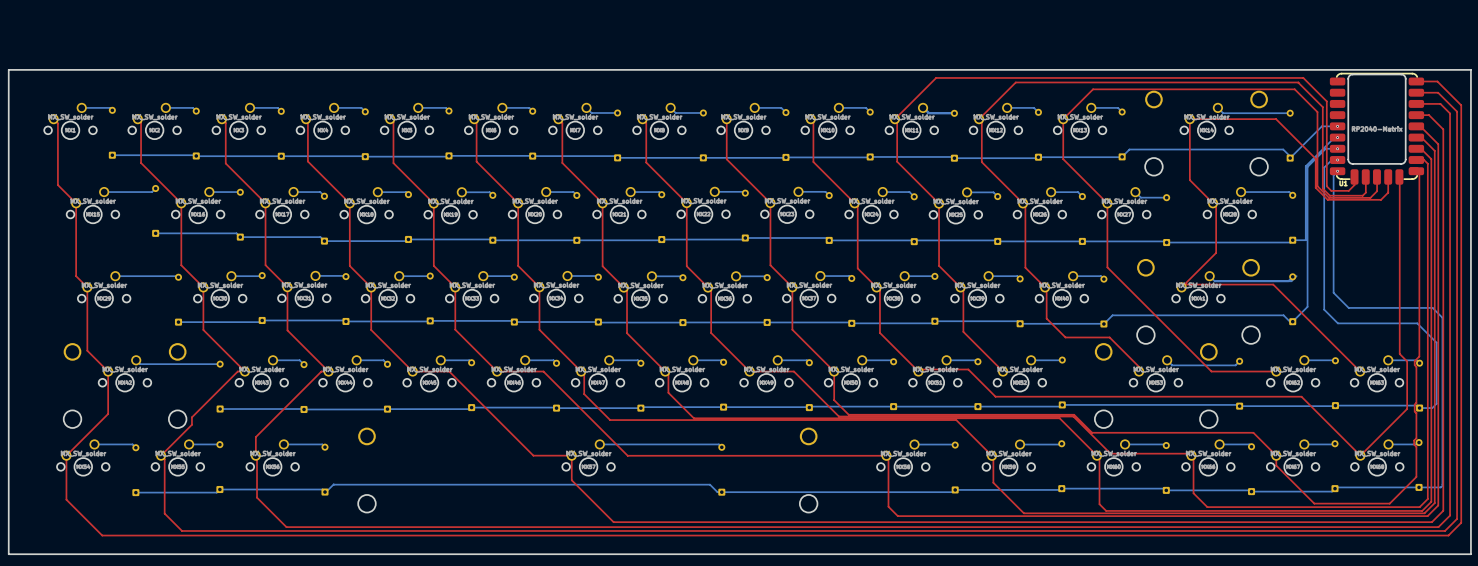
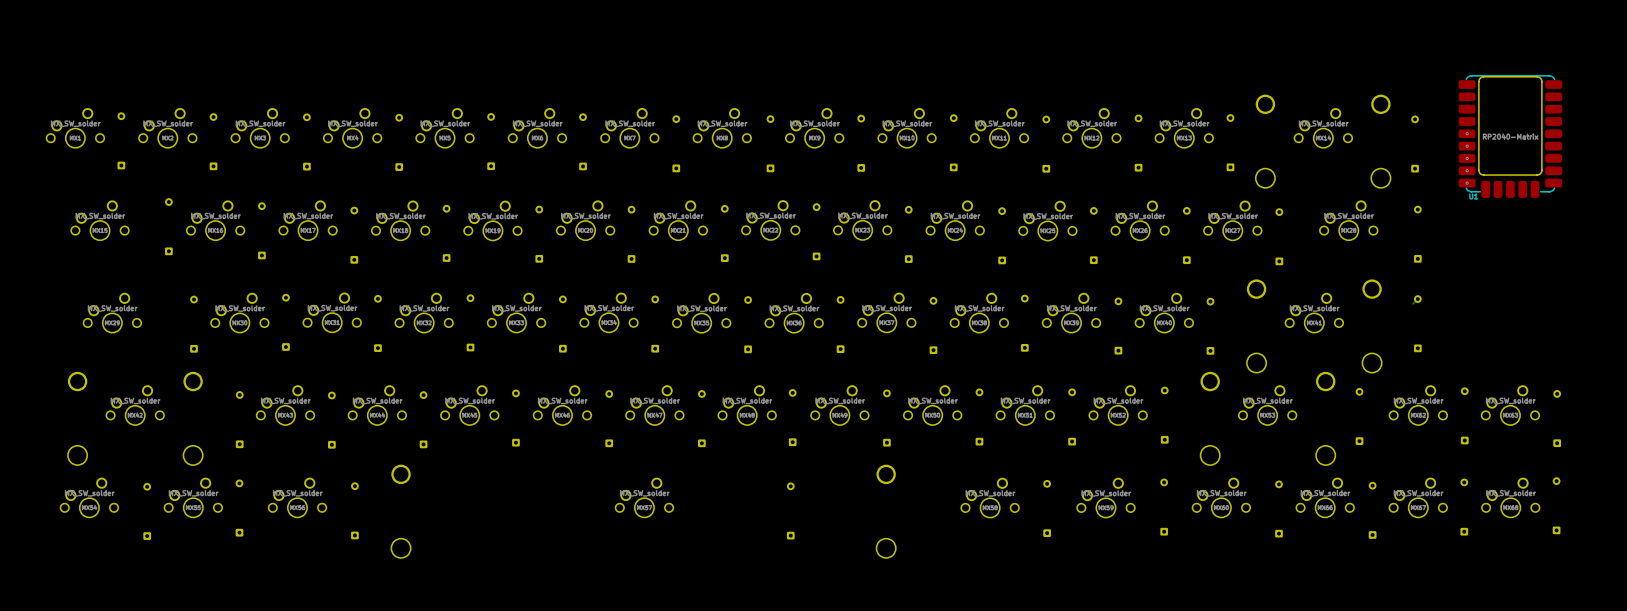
board edge: (8, 69) (1470, 69) (1470, 554) (8, 554) (8, 69) -> none
top track: (1416, 81) (1437, 81) (1461, 105) (1461, 522) (1448, 535) (102, 535) (66, 499) (66, 455) (108, 413) (108, 371) (87, 350) (87, 287) (76, 276) (76, 203) (57, 185) (57, 123) (53, 119) -> none
top track: (1416, 92) (1438, 92) (1457, 111) (1457, 518) (1444, 530) (182, 530) (164, 513) (164, 459) (161, 455) (191, 424) (191, 417) (237, 371) (244, 371) (203, 329) (203, 287) (181, 265) (181, 203) (141, 162) (141, 122) (137, 119) -> none
top track: (1416, 103) (1440, 103) (1450, 113) (1450, 515) (1438, 527) (286, 527) (257, 497) (255, 437) (321, 371) (328, 371) (287, 330) (287, 287) (265, 265) (265, 203) (225, 163) (225, 122) (221, 119) -> none
bottom track: (81, 107) (109, 107) (112, 110) -> none
bottom track: (165, 107) (193, 107) (196, 111) -> none
bottom track: (249, 107) (277, 107) (281, 111) -> none
bottom track: (334, 107) (361, 107) (365, 111) -> none
bottom track: (418, 107) (445, 107) (448, 111) -> none
bottom track: (502, 107) (529, 107) (532, 111) -> none
bottom track: (586, 107) (591, 112) (617, 112) -> none
bottom track: (670, 107) (675, 112) (703, 112) -> none
bottom track: (754, 107) (781, 107) (785, 112) -> none
bottom track: (838, 107) (865, 107) (870, 112) -> none
bottom track: (1007, 107) (1034, 107) (1038, 112) -> none
bottom track: (1091, 107) (1118, 107) (1122, 112) -> none
bottom track: (1217, 107) (1223, 113) (1290, 113) -> none
bottom track: (929, 113) (924, 107) (923, 107) (928, 113) (954, 113) -> none
top track: (1416, 115) (1429, 115) (1443, 129) (1443, 510) (1431, 522) (613, 522) (571, 480) (571, 455) (533, 455) (449, 371) (412, 371) (371, 330) (371, 287) (349, 265) (349, 203) (307, 161) (307, 120) (306, 119) -> none
top track: (390, 119) (393, 122) (393, 163) (433, 203) (433, 265) (455, 287) (455, 329) (497, 371) (543, 371) (627, 455) (886, 455) (888, 457) (888, 506) (897, 516) (1427, 516) (1438, 505) (1438, 144) (1420, 126) (1416, 126) -> none
top track: (474, 119) (476, 121) (476, 161) (518, 203) (518, 265) (539, 287) (539, 329) (584, 374) (584, 394) (610, 420) (956, 420) (993, 457) (993, 482) (1023, 513) (1424, 513) (1434, 503) (1434, 150) (1421, 137) (1416, 137) -> none
top track: (558, 119) (562, 123) (562, 163) (602, 203) (602, 266) (627, 290) (627, 333) (668, 374) (668, 392) (693, 418) (1059, 418) (1099, 458) (1099, 504) (1106, 510) (1422, 510) (1431, 501) (1431, 159) (1421, 148) (1416, 148) -> none
top track: (642, 119) (646, 122) (646, 162) (686, 203) (686, 266) (711, 290) (711, 332) (749, 371) (793, 371) (838, 416) (1073, 416) (1110, 453) (1189, 453) (1193, 457) (1193, 493) (1207, 507) (1419, 507) (1427, 499) (1427, 163) (1424, 160) (1416, 160) -> none
top track: (726, 119) (726, 159) (770, 203) (770, 265) (792, 287) (792, 329) (834, 371) (834, 400) (848, 414) (1074, 414) (1092, 432) (1253, 432) (1276, 455) (1276, 465) (1314, 503) (1389, 503) (1416, 476) (1416, 446) (1414, 444) (1416, 438) (1416, 412) (1414, 411) (1416, 366) (1414, 361) (1419, 356) (1419, 174) (1416, 171) -> none
top track: (810, 119) (813, 121) (813, 161) (857, 206) (857, 268) (879, 290) (879, 332) (918, 371) (920, 369) (968, 369) (995, 396) (1301, 396) (1360, 455) (1407, 408) (1407, 361) (1399, 353) (1399, 179) -> none
bottom track: (1337, 126) (1321, 126) (1290, 158) (1283, 149) (1129, 149) (1121, 157) (1037, 158) (112, 155) -> none
bottom track: (1337, 137) (1334, 137) (1305, 166) (1305, 240) -> none
bottom track: (1337, 148) (1325, 148) (1307, 167) (1307, 306) (1292, 321) (1289, 321) (1283, 315) (1112, 315) (1103, 324) (1020, 323) (1017, 321) (934, 321) (932, 323) (344, 320) (178, 322) -> none
bottom track: (1337, 160) (1331, 160) (1324, 167) (1324, 309) (1337, 323) (1417, 323) (1436, 342) (1436, 403) (1432, 408) (1419, 408) (1417, 405) (1238, 404) (977, 406) -> none
bottom track: (1337, 171) (1333, 175) (1333, 292) (1348, 307) (1432, 307) (1442, 317) (1443, 485) (1440, 487) (1336, 487) (1332, 491) (1061, 488) (955, 489) (952, 492) (717, 492) (709, 484) (333, 484) (326, 492) (322, 489) (219, 489) (216, 492) (135, 492) -> none
top track: (1354, 176) (1354, 185) (1348, 190) (1331, 190) (1326, 186) (1326, 101) (1303, 77) (936, 77) (894, 119) (897, 121) (897, 161) (939, 203) (939, 265) (963, 290) (963, 331) (1003, 371) -> none
top track: (1388, 176) (1388, 192) (1381, 199) (1327, 199) (1315, 187) (1315, 158) (1276, 119) (1189, 119) (1189, 180) (1216, 206) (1216, 252) (1181, 287) -> none
top track: (1365, 179) (1365, 192) (1362, 195) (1329, 195) (1322, 188) (1322, 107) (1298, 82) (1015, 82) (979, 119) (981, 121) (981, 162) (1025, 205) (1025, 267) (1046, 288) (1046, 318) (1065, 337) (1109, 337) (1139, 366) (1139, 371) -> none
top track: (1377, 179) (1377, 191) (1370, 197) (1329, 197) (1317, 186) (1317, 112) (1294, 89) (1093, 89) (1063, 119) (1063, 159) (1107, 203) (1107, 267) (1211, 371) (1276, 371) -> none
bottom track: (155, 188) (152, 192) (104, 192) -> none
bottom track: (714, 191) (745, 193) -> none
bottom track: (798, 191) (825, 191) (829, 195) -> none
bottom track: (209, 192) (240, 192) -> none
bottom track: (293, 192) (320, 192) (324, 196) -> none
bottom track: (377, 192) (406, 192) (408, 194) -> none
bottom track: (461, 192) (489, 192) (492, 195) -> none
bottom track: (546, 192) (573, 192) (576, 195) -> none
bottom track: (630, 192) (659, 192) (661, 194) -> none
bottom track: (882, 192) (909, 192) (914, 196) -> none
bottom track: (967, 192) (993, 192) (997, 196) -> none
bottom track: (1051, 192) (1078, 192) (1082, 196) -> none
bottom track: (1135, 192) (1140, 197) (1166, 197) -> none
bottom track: (1241, 192) (1289, 192) (1292, 195) -> none
bottom track: (155, 233) (236, 233) (240, 237) (320, 237) (324, 241) (660, 240) (743, 239) (745, 237) (826, 237) (829, 240) (1166, 242) (1290, 242) (1292, 240) (1305, 240) -> none
bottom track: (262, 275) (231, 276) -> none
bottom track: (315, 275) (345, 276) -> none
bottom track: (115, 276) (178, 277) -> none
bottom track: (430, 276) (399, 276) -> none
bottom track: (483, 276) (514, 277) -> none
bottom track: (567, 276) (598, 277) -> none
bottom track: (651, 276) (682, 277) -> none
bottom track: (736, 276) (767, 277) -> none
bottom track: (820, 276) (849, 276) (851, 278) -> none
bottom track: (904, 276) (934, 276) -> none
bottom track: (988, 276) (1017, 276) (1020, 278) -> none
bottom track: (1073, 276) (1100, 276) (1103, 279) -> none
bottom track: (1296, 276) (1291, 281) (1214, 281) (1209, 276) -> none
top track: (1184, 284) (1273, 284) (1360, 371) -> none
bottom track: (136, 360) (140, 364) (220, 364) -> none
bottom track: (273, 360) (299, 360) (304, 364) -> none
bottom track: (356, 360) (383, 360) (387, 364) -> none
bottom track: (440, 360) (469, 360) (471, 362) -> none
bottom track: (525, 360) (553, 360) (556, 363) -> none
bottom track: (609, 360) (637, 360) (640, 363) -> none
bottom track: (693, 360) (721, 360) (723, 362) -> none
bottom track: (777, 360) (806, 360) (809, 362) -> none
bottom track: (862, 360) (893, 361) -> none
bottom track: (946, 360) (977, 361) -> none
bottom track: (1062, 360) (1031, 360) -> none
bottom track: (1167, 360) (1172, 365) (1235, 365) (1239, 361) -> none
bottom track: (1304, 360) (1335, 360) -> none
bottom track: (1388, 360) (1416, 360) (1419, 363) -> none
bottom track: (977, 406) (220, 409) -> none
bottom track: (1419, 442) (1417, 444) (1388, 444) -> none
bottom track: (1061, 443) (1020, 444) -> none
bottom track: (1335, 443) (1304, 444) -> none
bottom track: (94, 444) (132, 444) (135, 447) -> none
bottom track: (189, 444) (219, 444) -> none
bottom track: (283, 444) (322, 444) (325, 447) -> none
bottom track: (599, 444) (718, 444) (721, 447) -> none
bottom track: (914, 444) (955, 445) -> none
bottom track: (1125, 444) (1166, 445) -> none
bottom track: (1219, 444) (1249, 444) (1251, 446) -> none

